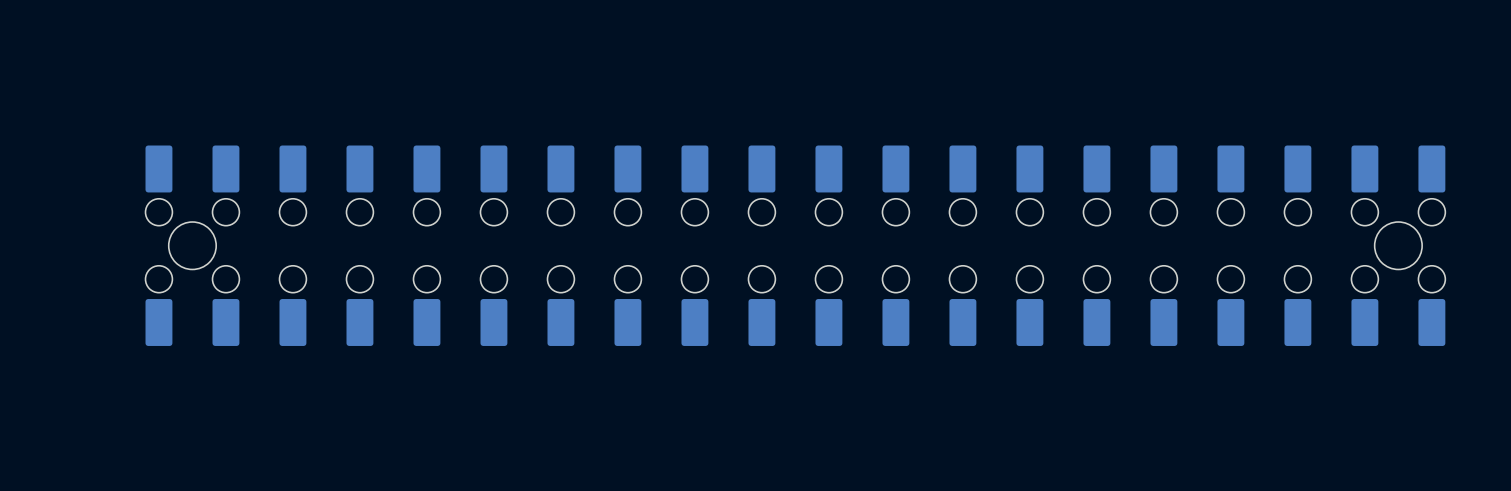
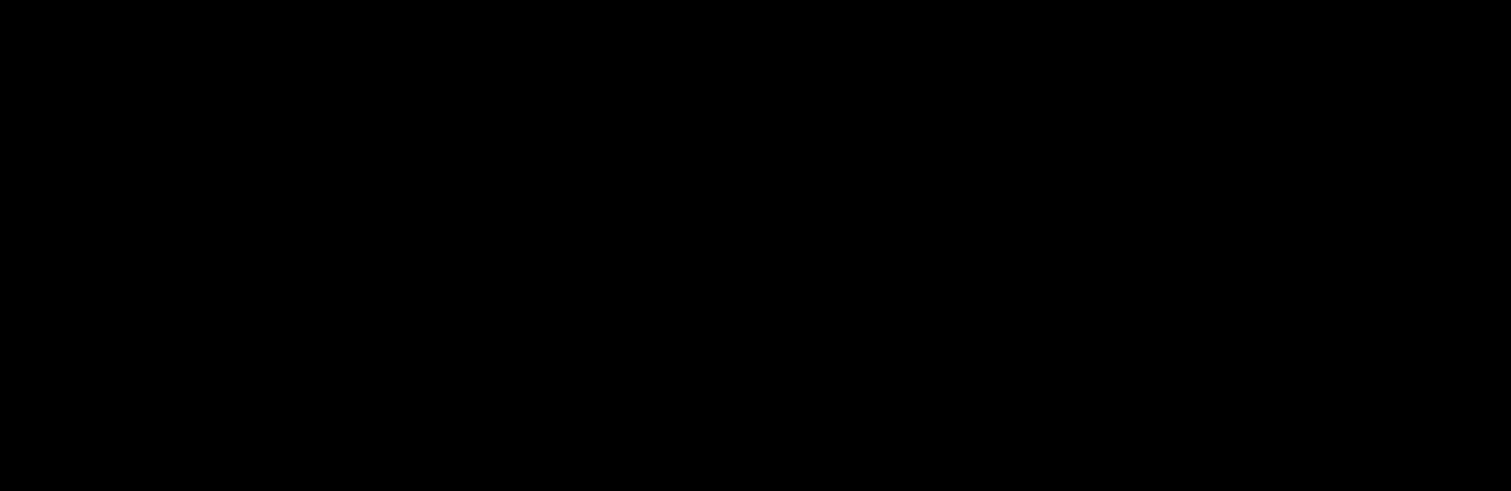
part: (795, 245) -> none

